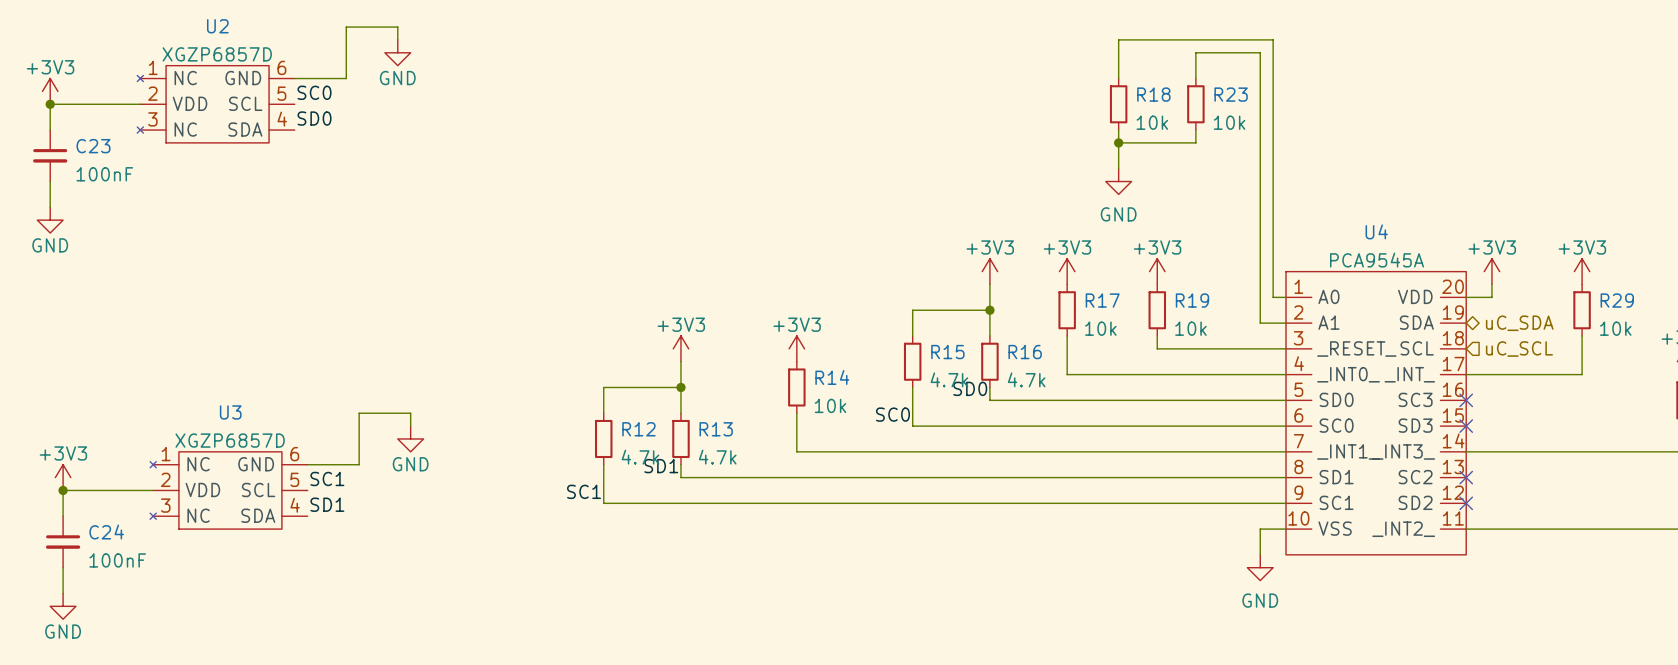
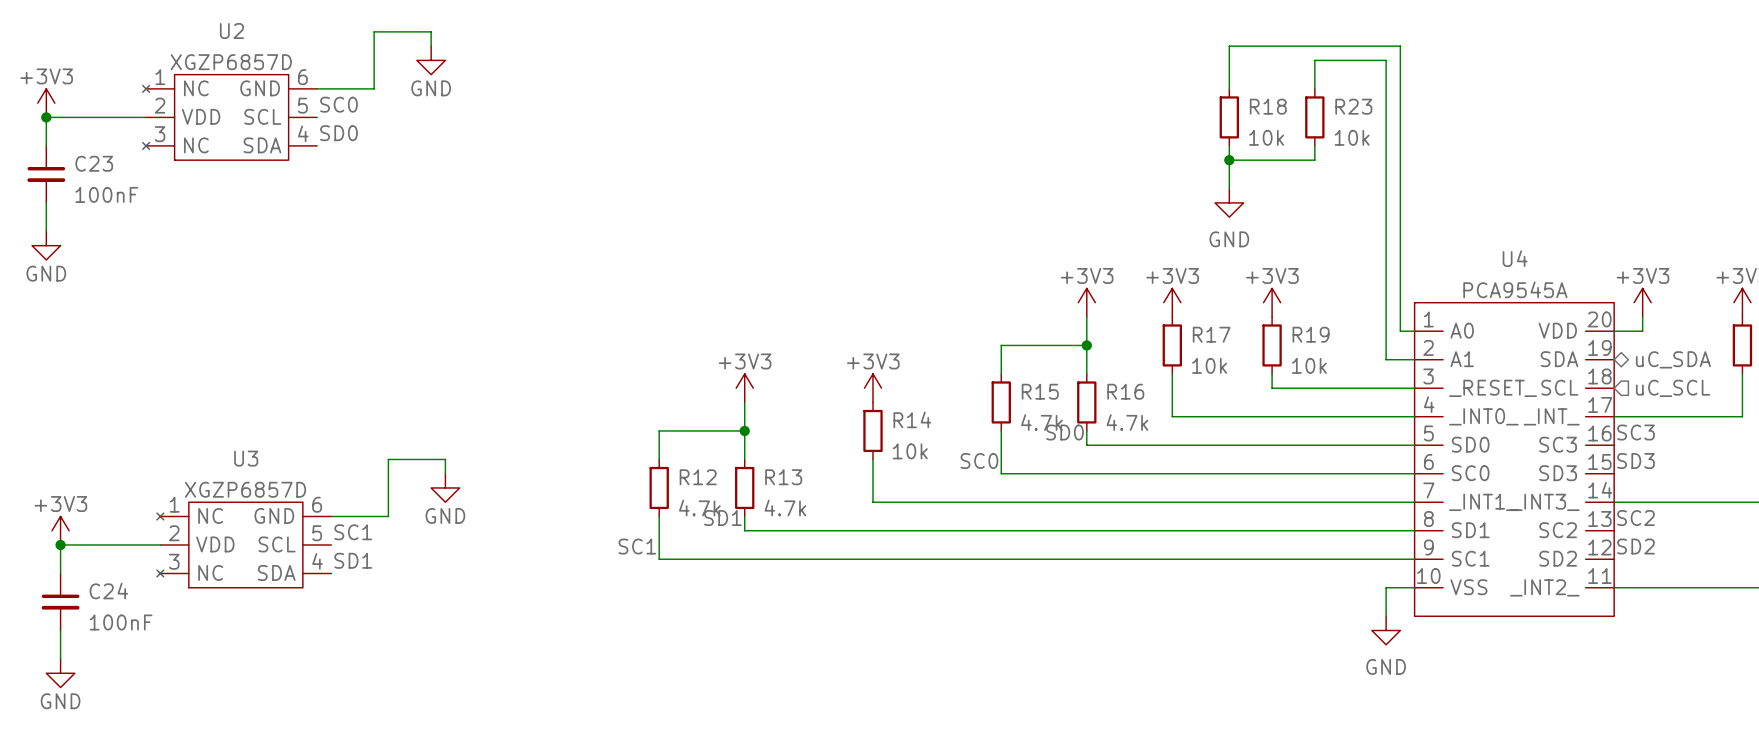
label: none -> SC3 (1635, 432)
no-connect mark: (1466, 400) -> none
label: none -> SD3 (1635, 461)
no-connect mark: (1466, 426) -> none
label: none -> SC2 (1635, 518)
no-connect mark: (1466, 477) -> none
label: none -> SD2 (1635, 546)
no-connect mark: (1466, 503) -> none

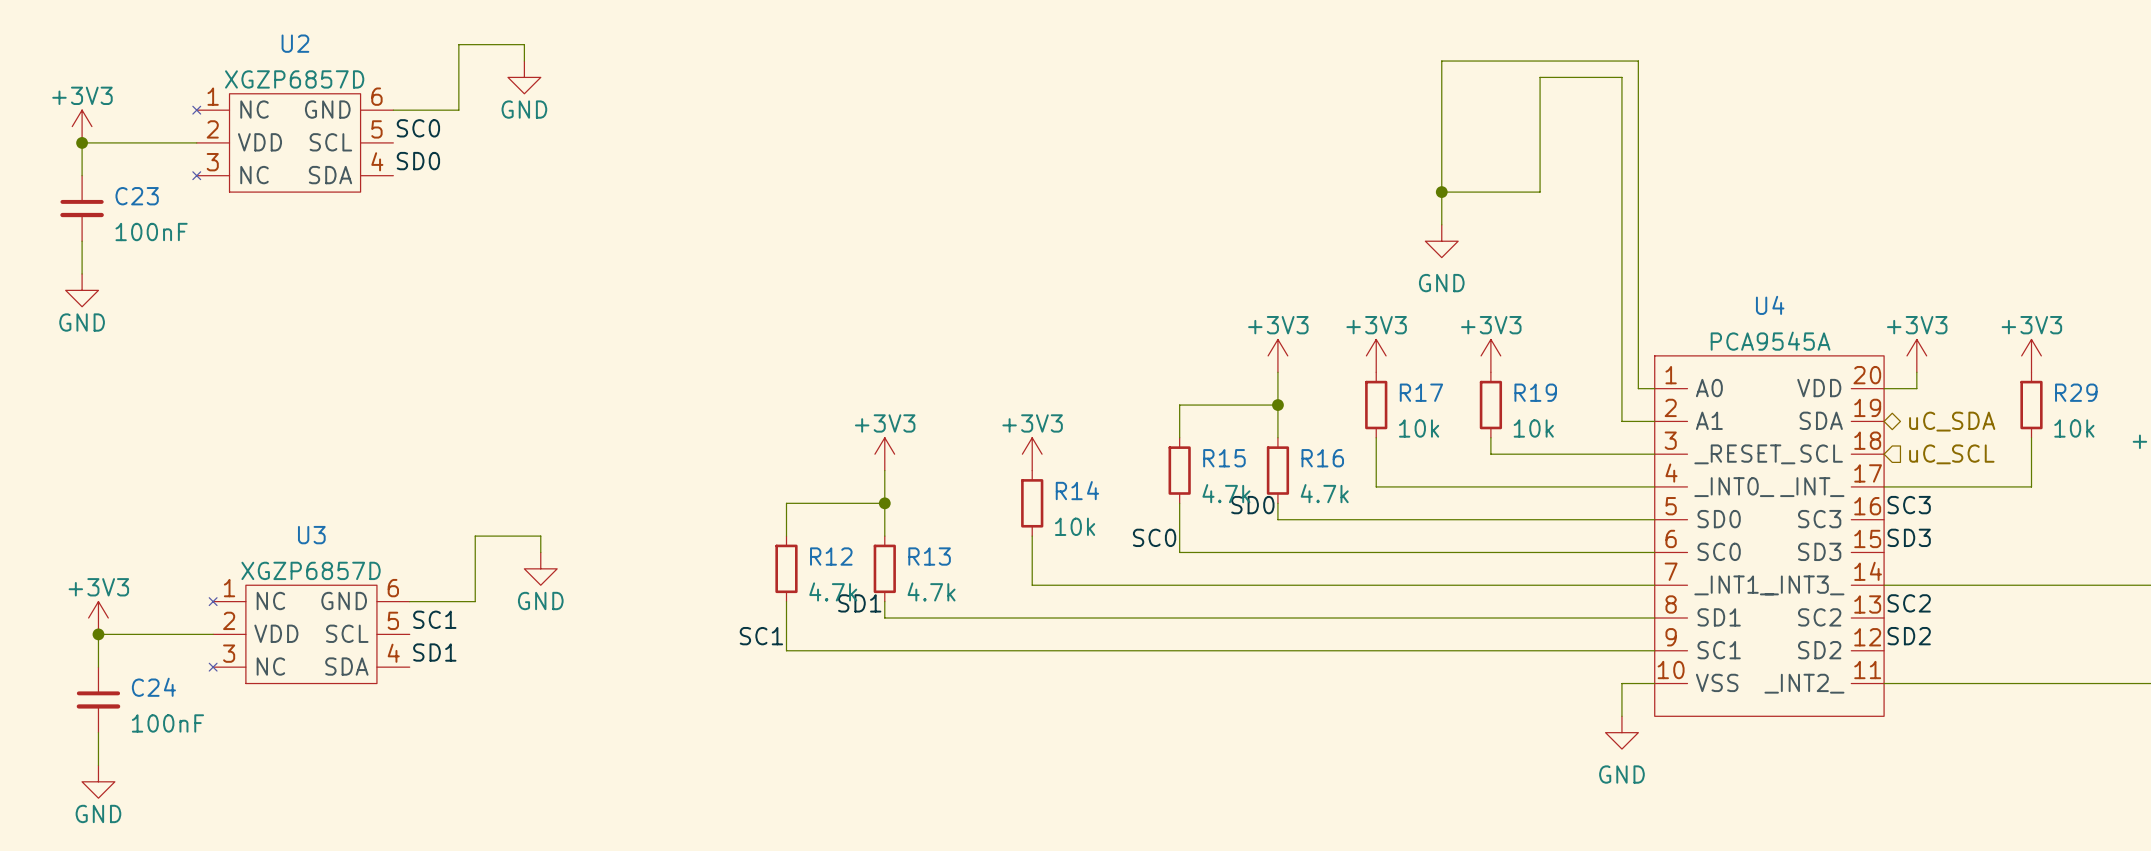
wire: none -> (1441, 110) (1441, 175)
wire: none -> (1540, 110) (1540, 175)
R18: 10k (1229, 117) -> none
R23: 10k (1314, 117) -> none

